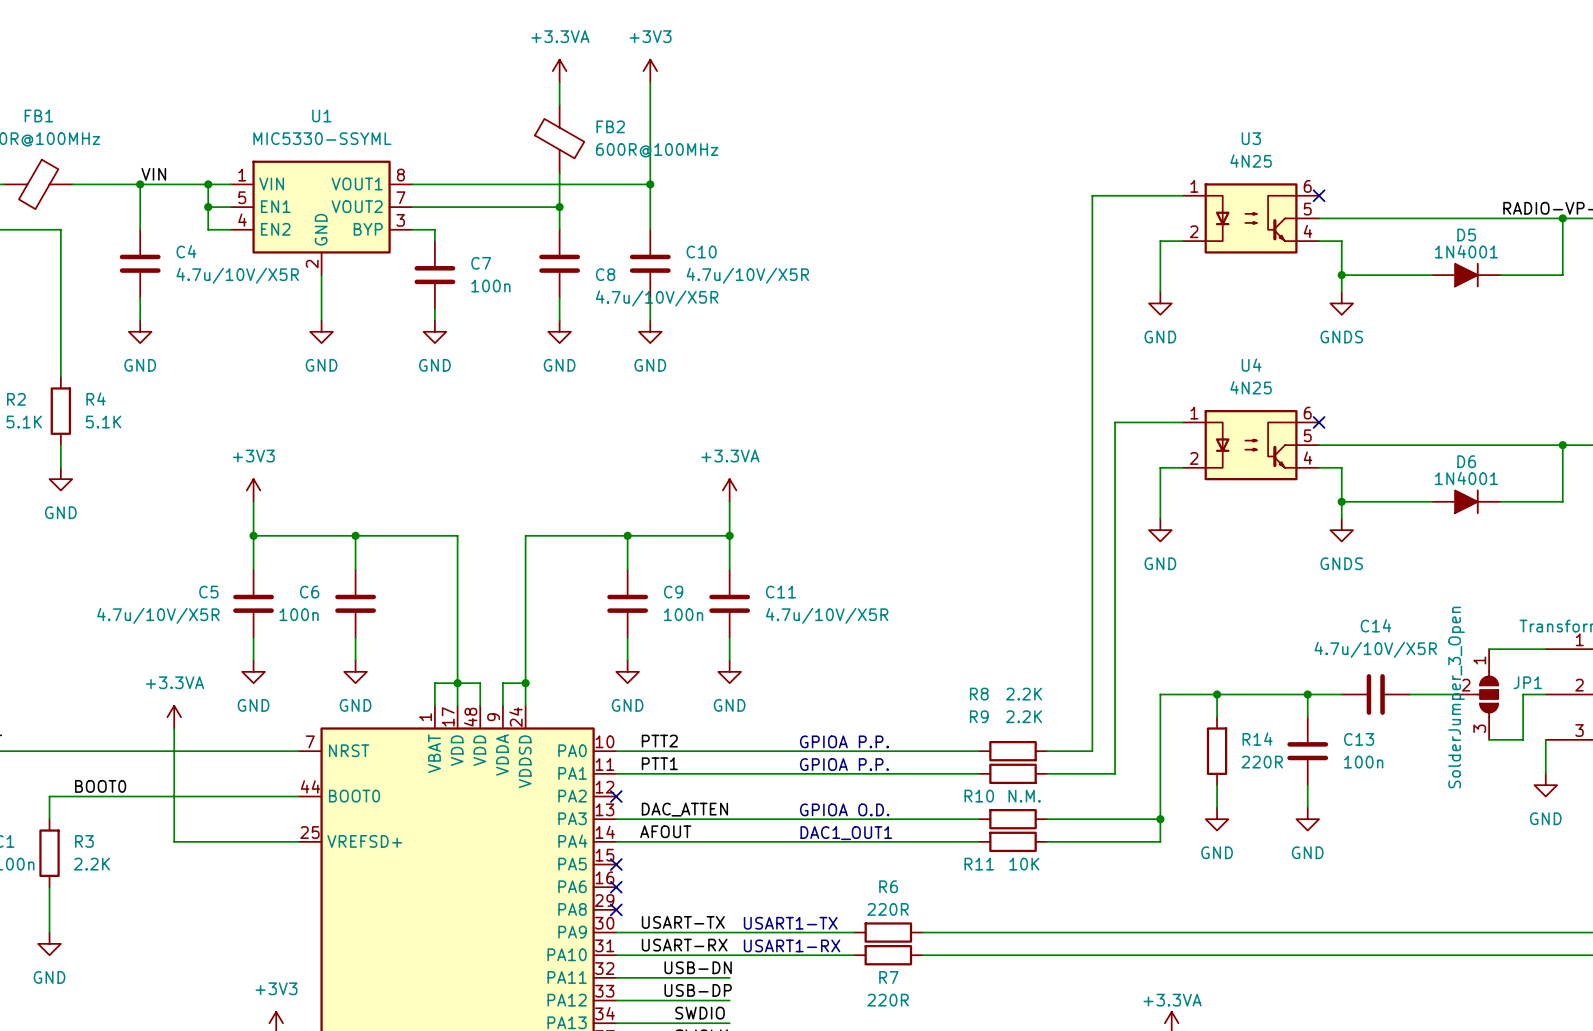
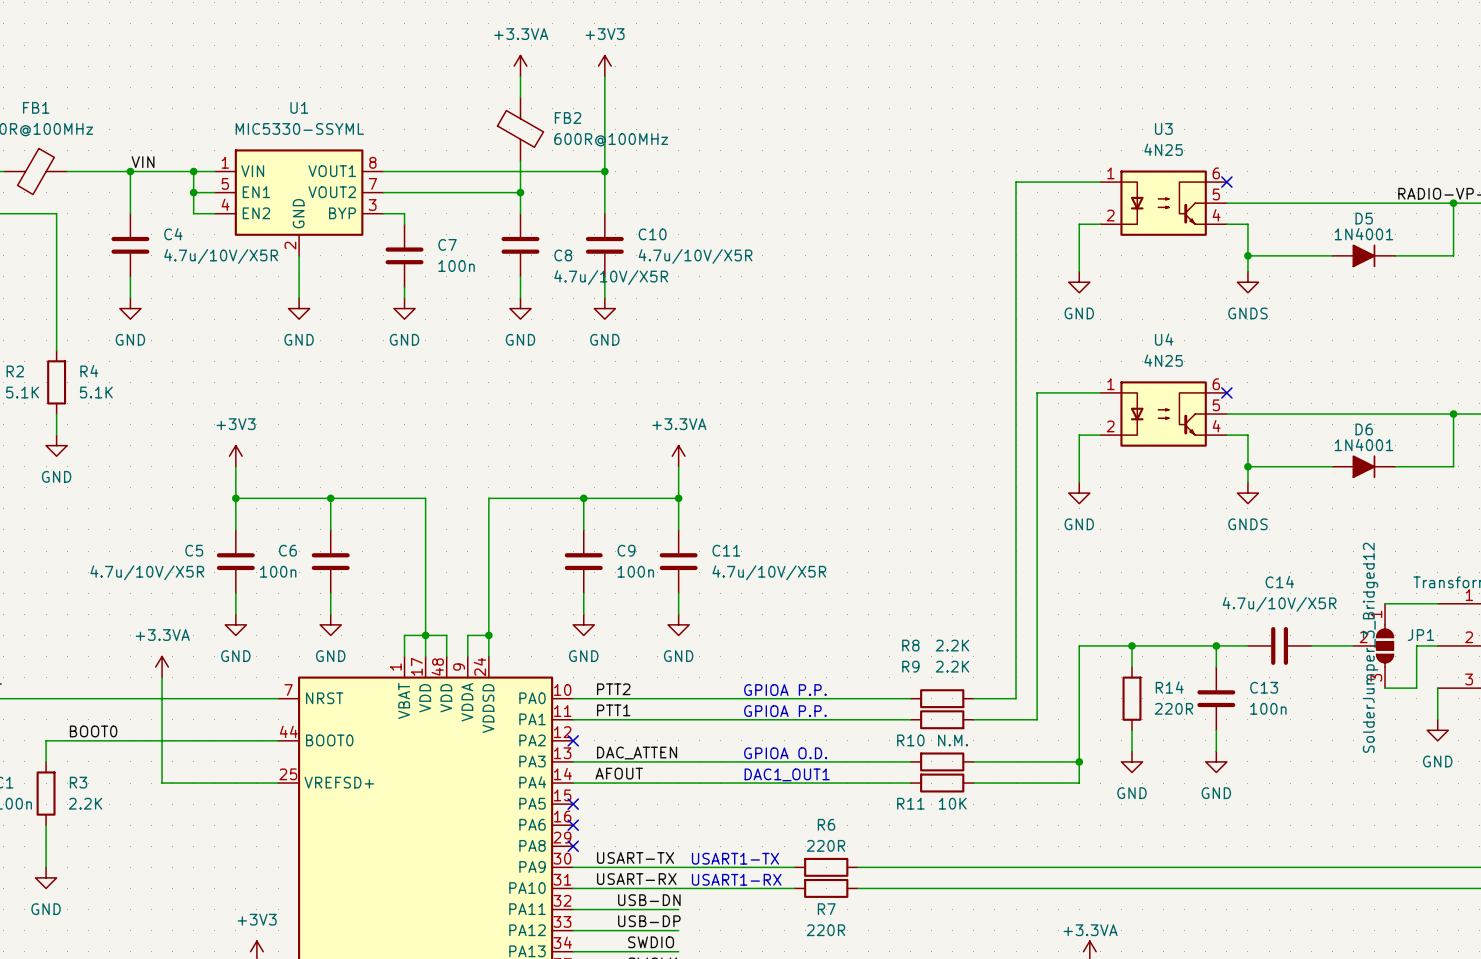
JP1 value: SolderJumper_3_Open (1456, 697) -> SolderJumper_3_Bridged12 (1370, 647)

